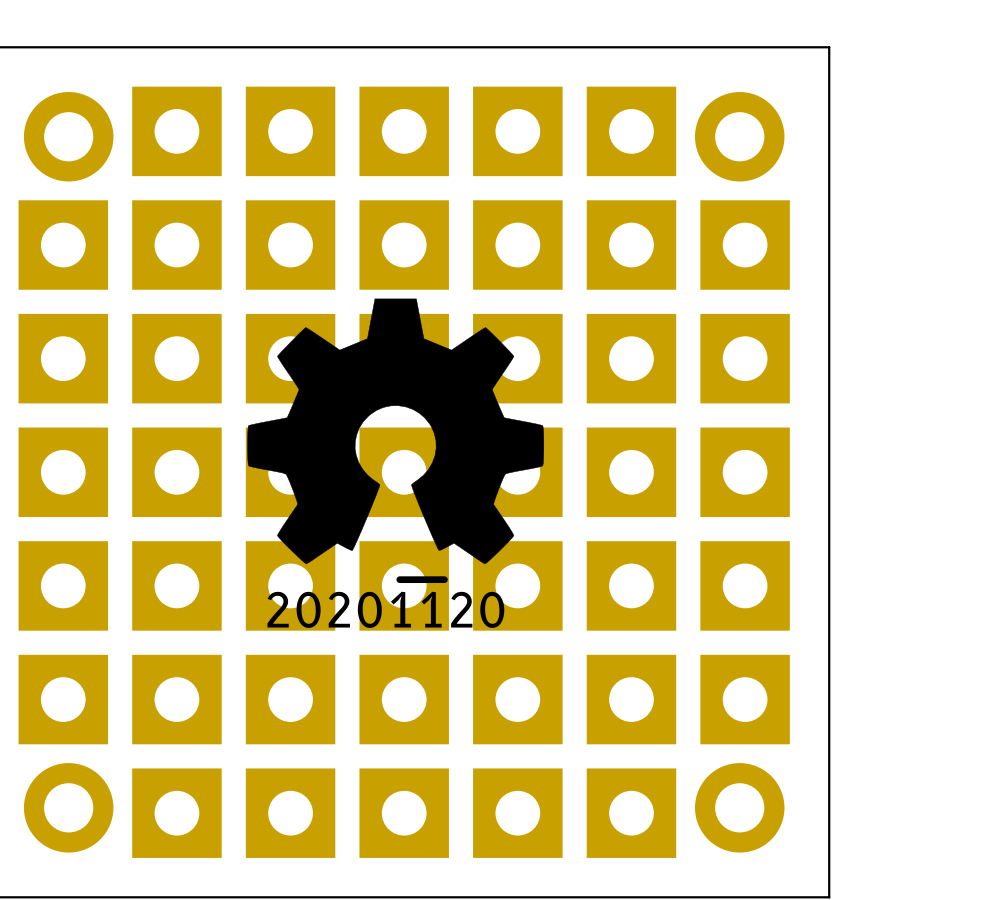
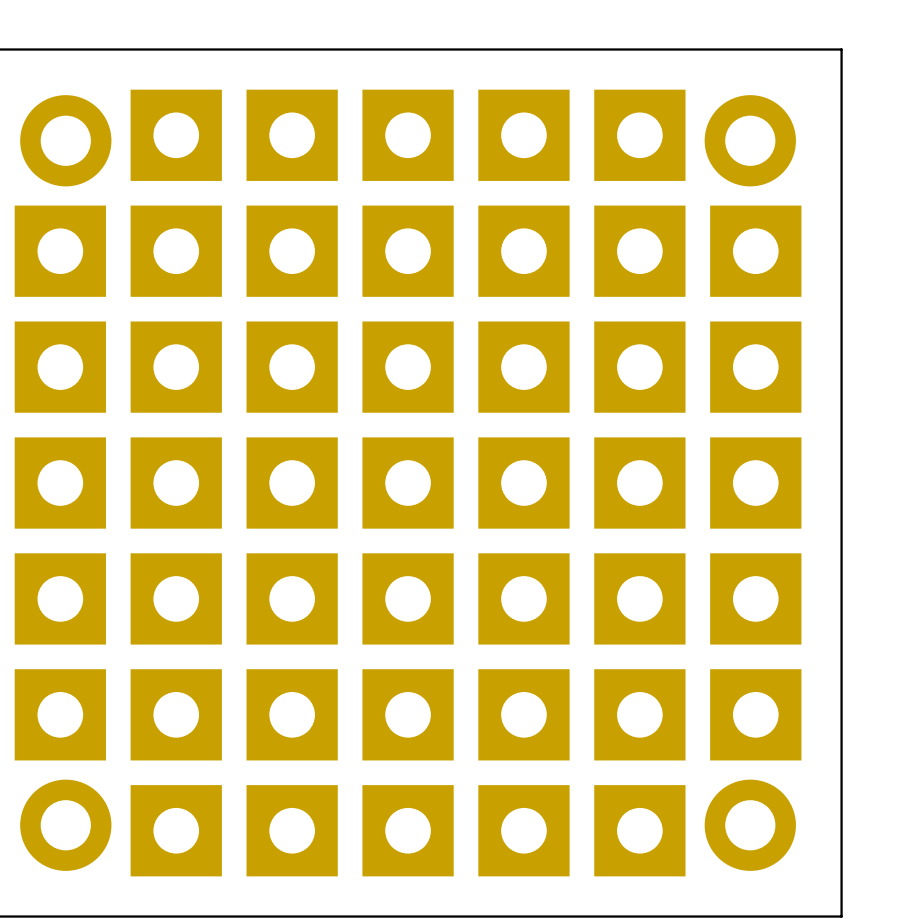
drawing: [247, 298, 545, 584] -> none

